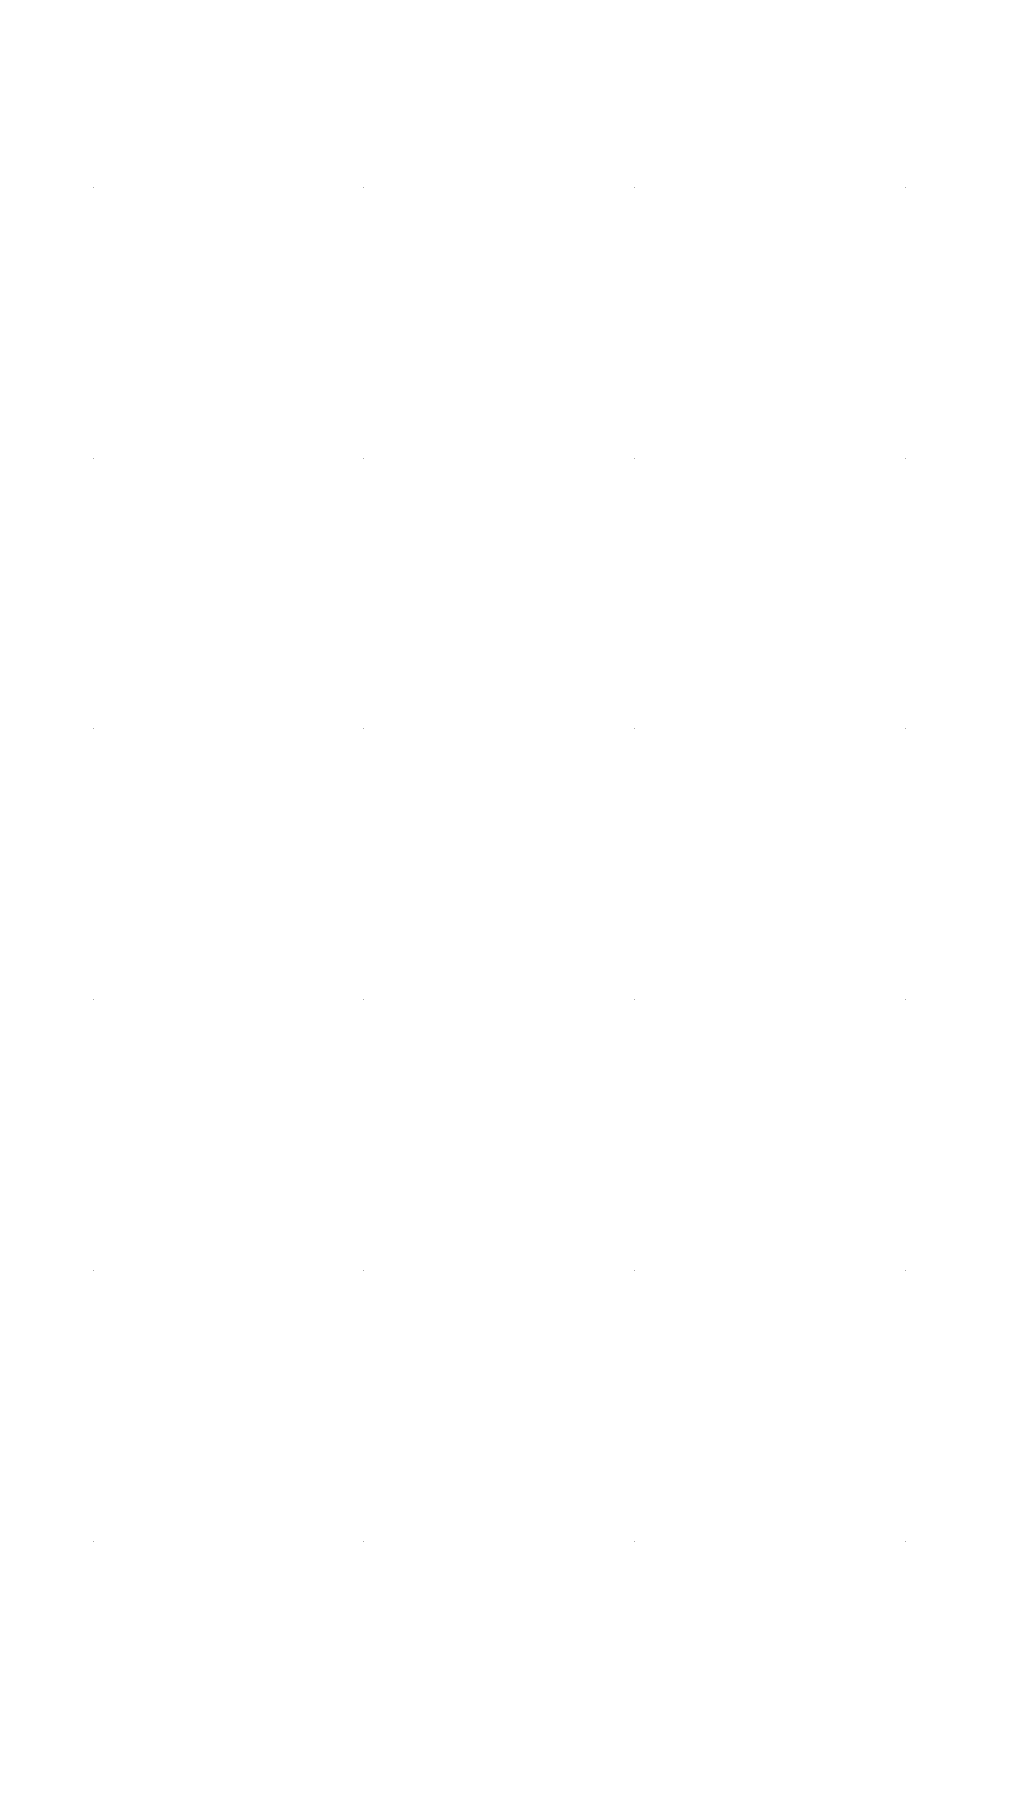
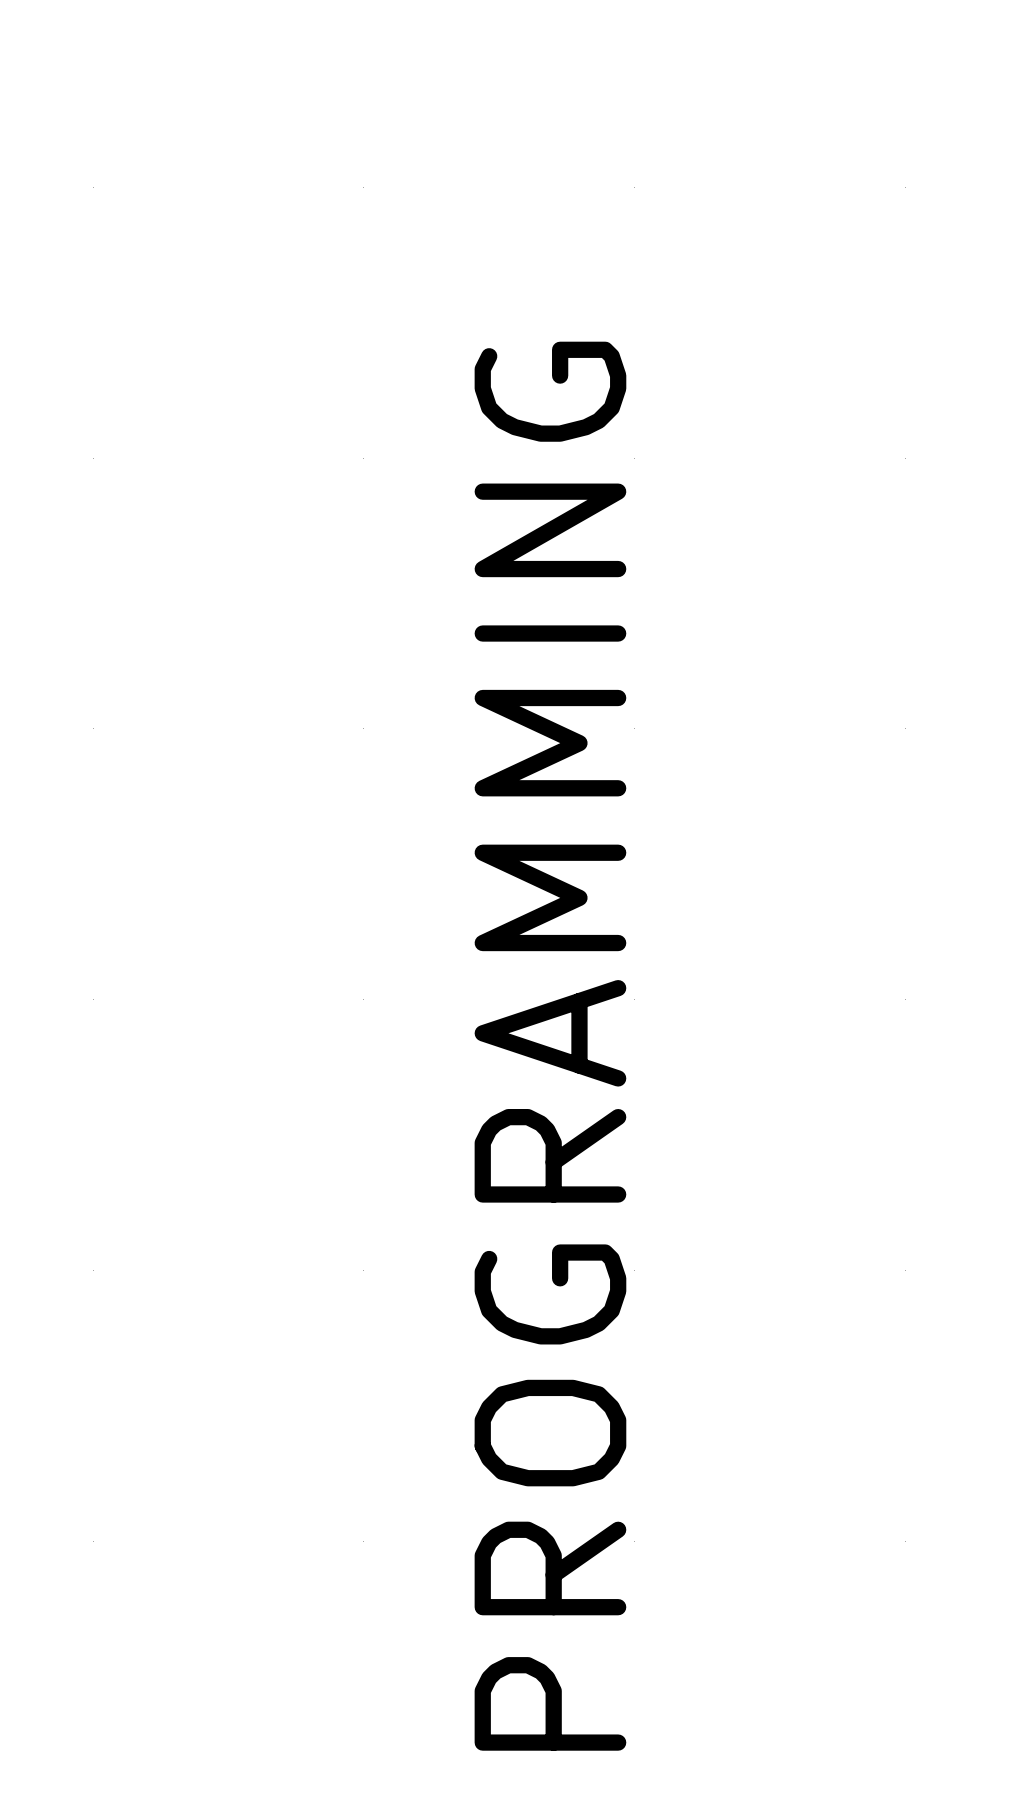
text: none -> PROGRAMMING (550, 1046)

